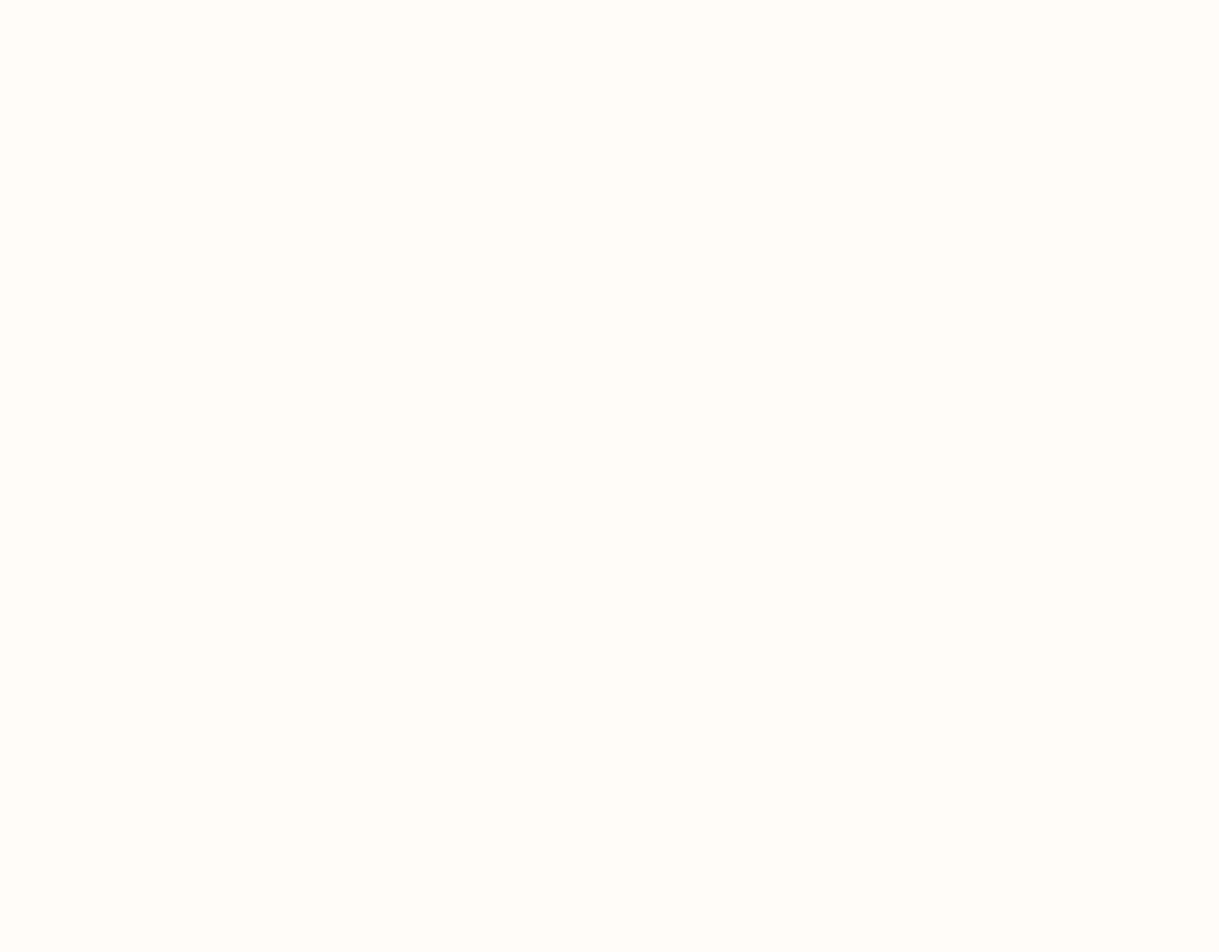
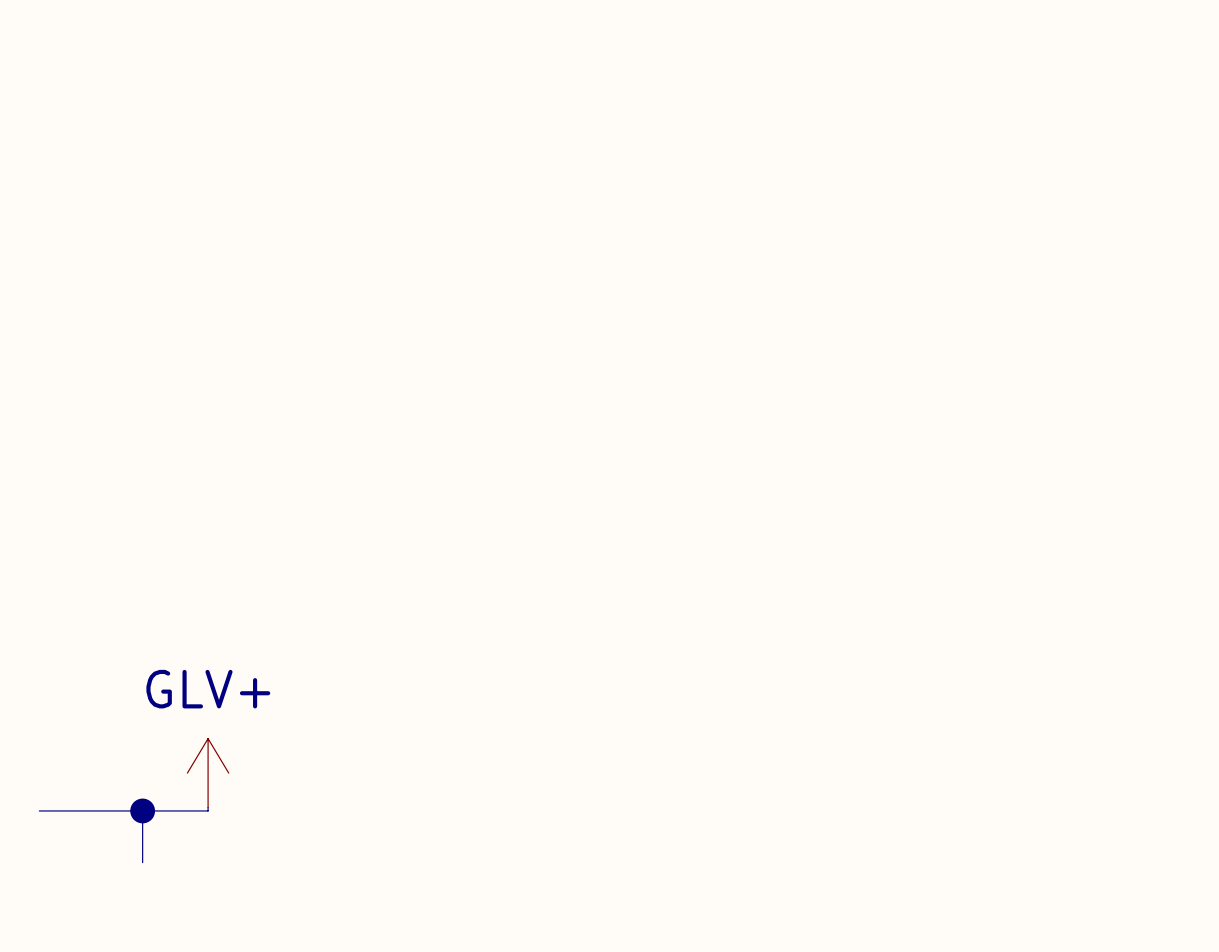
power symbol: none -> GLV+ (208, 773)
wire: none -> (208, 807) (208, 810) (39, 810)
wire: none -> (142, 810) (142, 862)
junction: none -> (142, 810)

